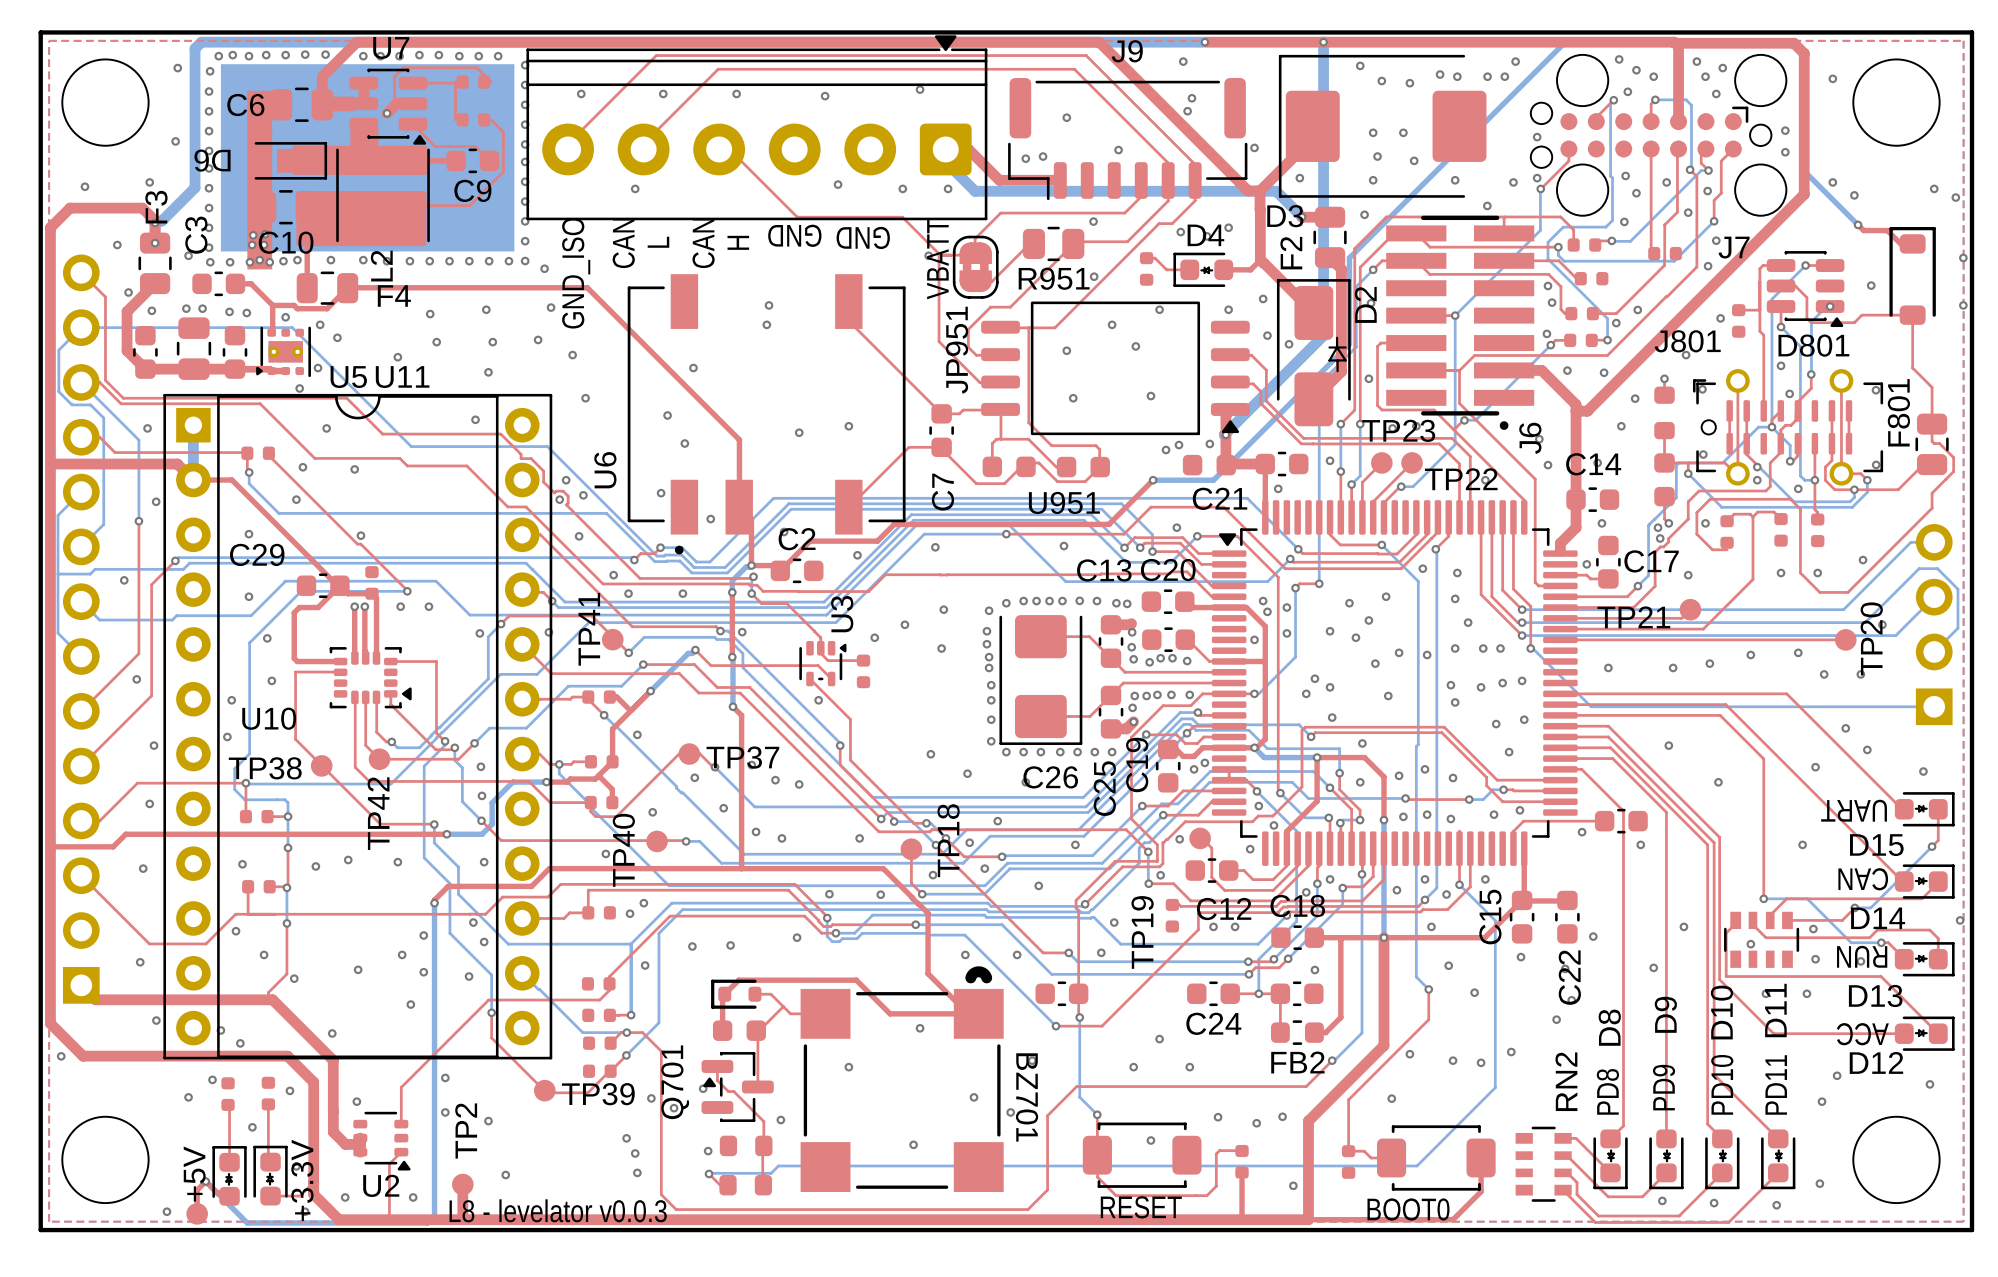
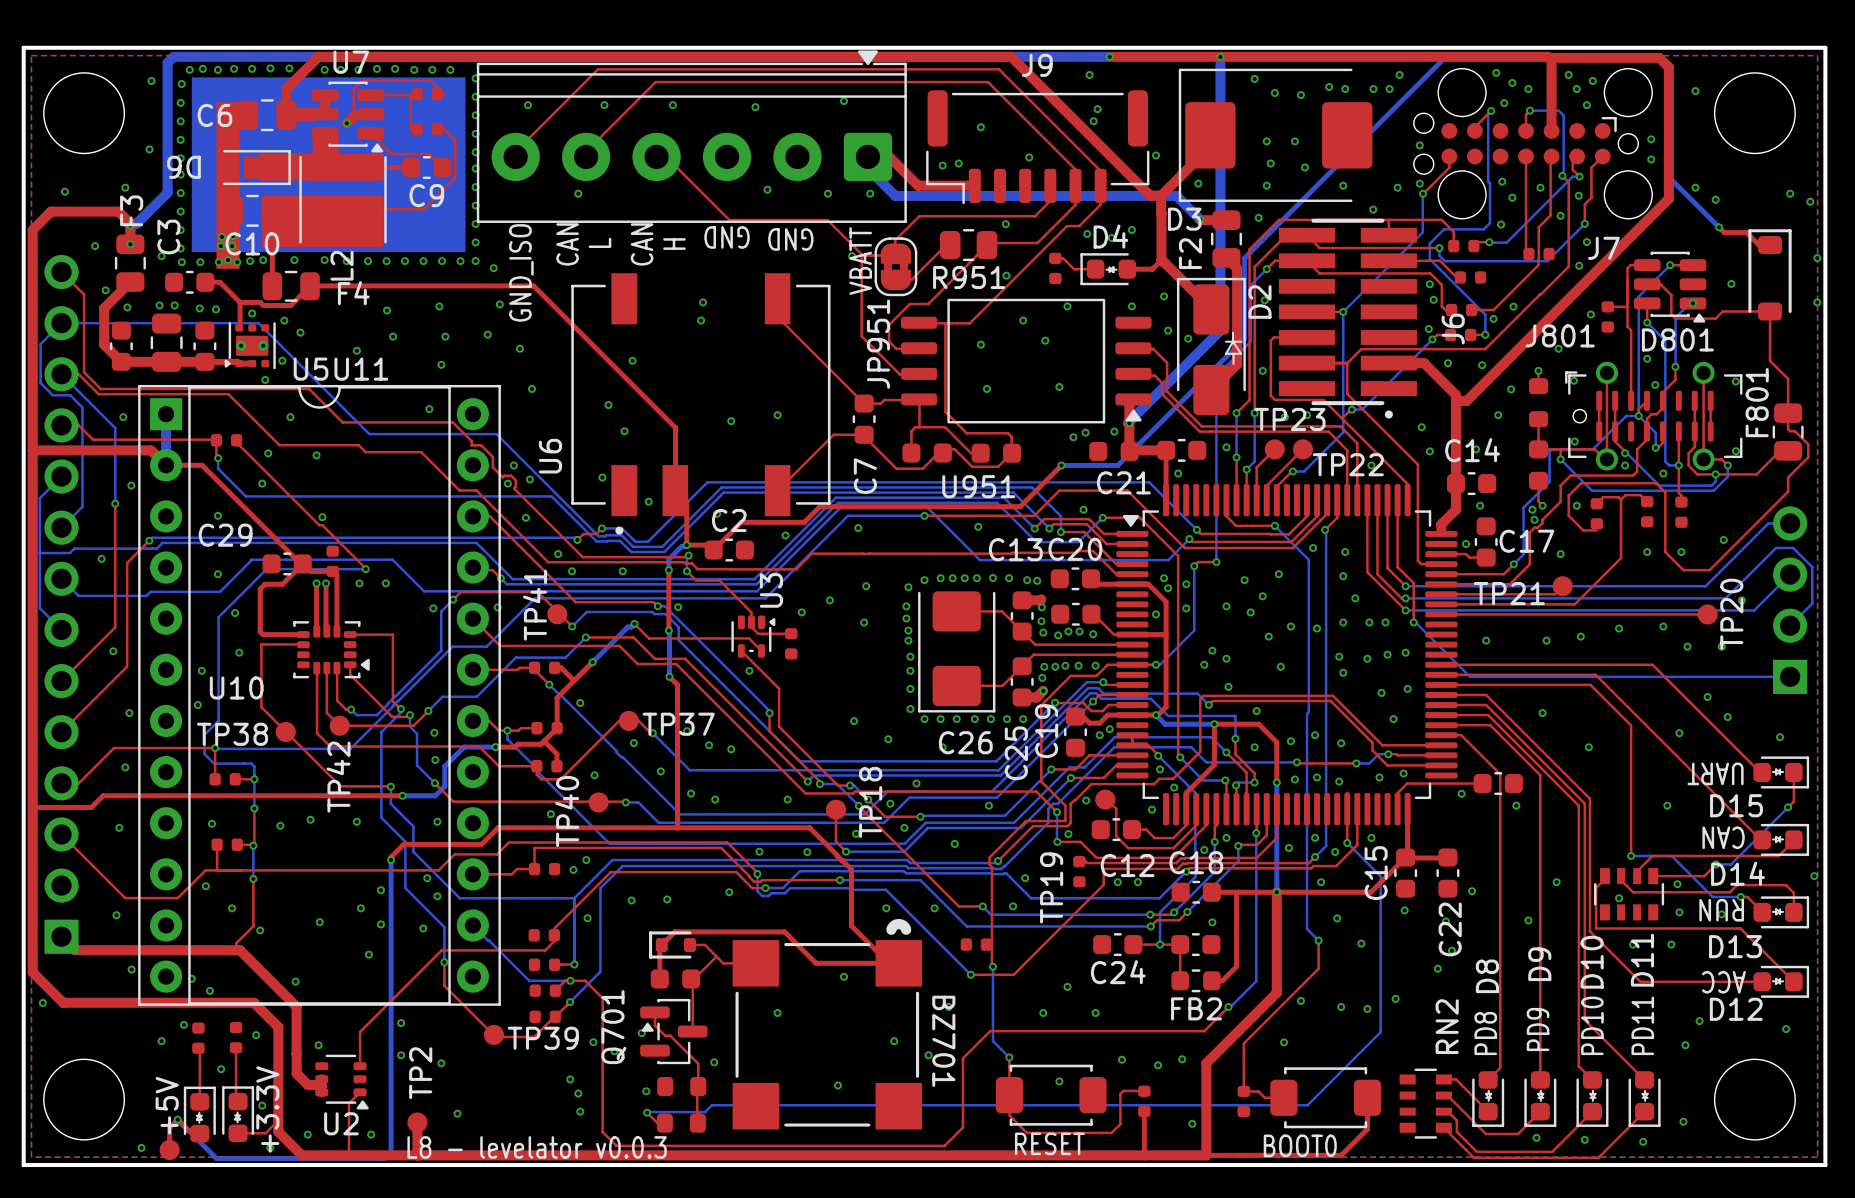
J6 name position: J6 (1530, 438) -> J6 (1453, 329)
part footprint: [1035, 981, 1089, 1007] -> [960, 938, 993, 951]

